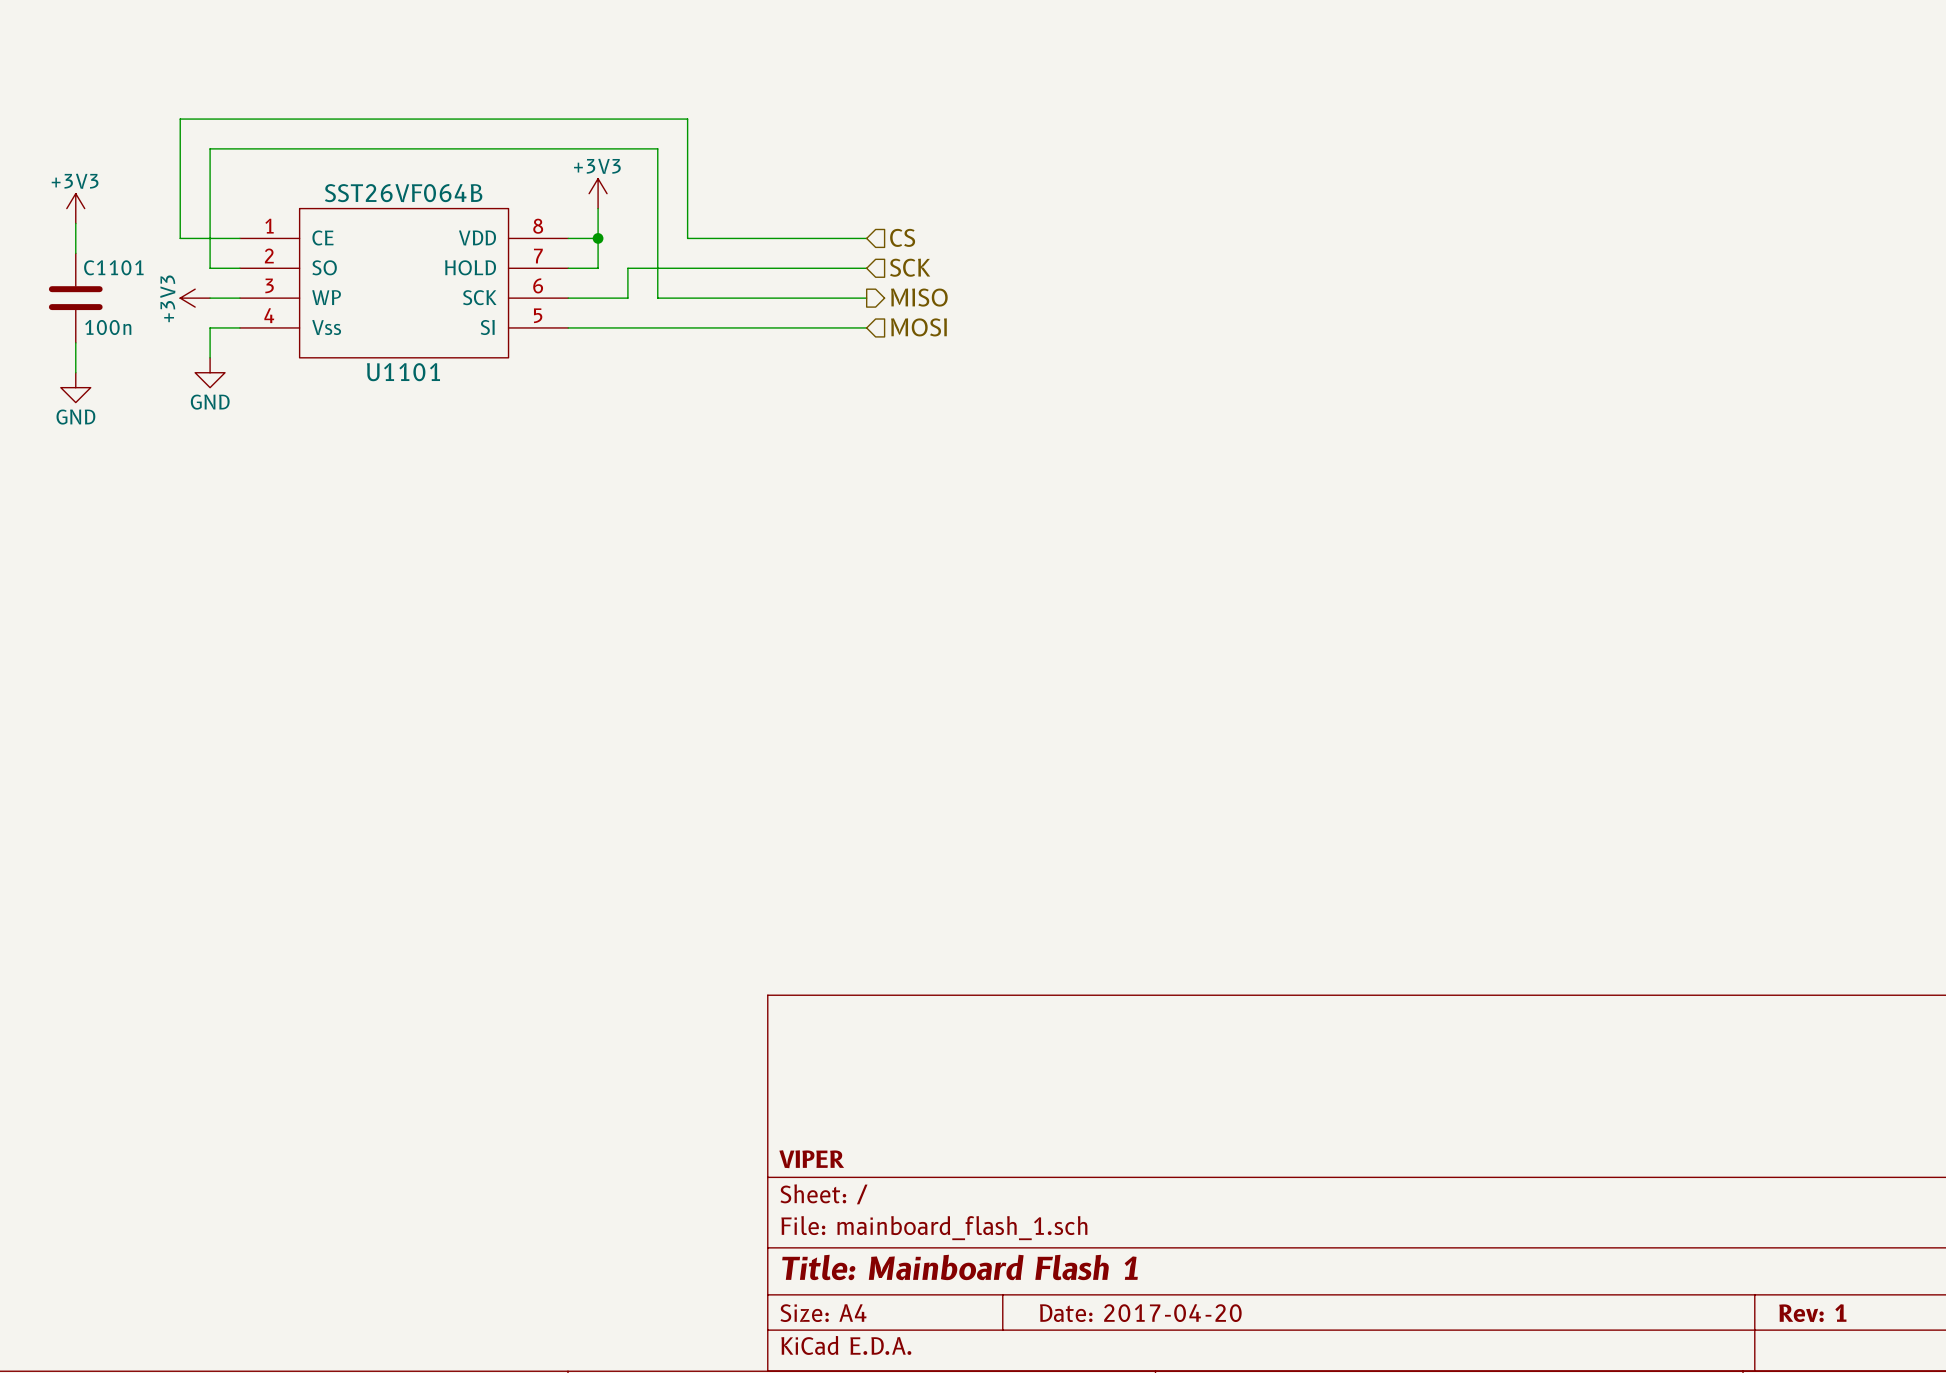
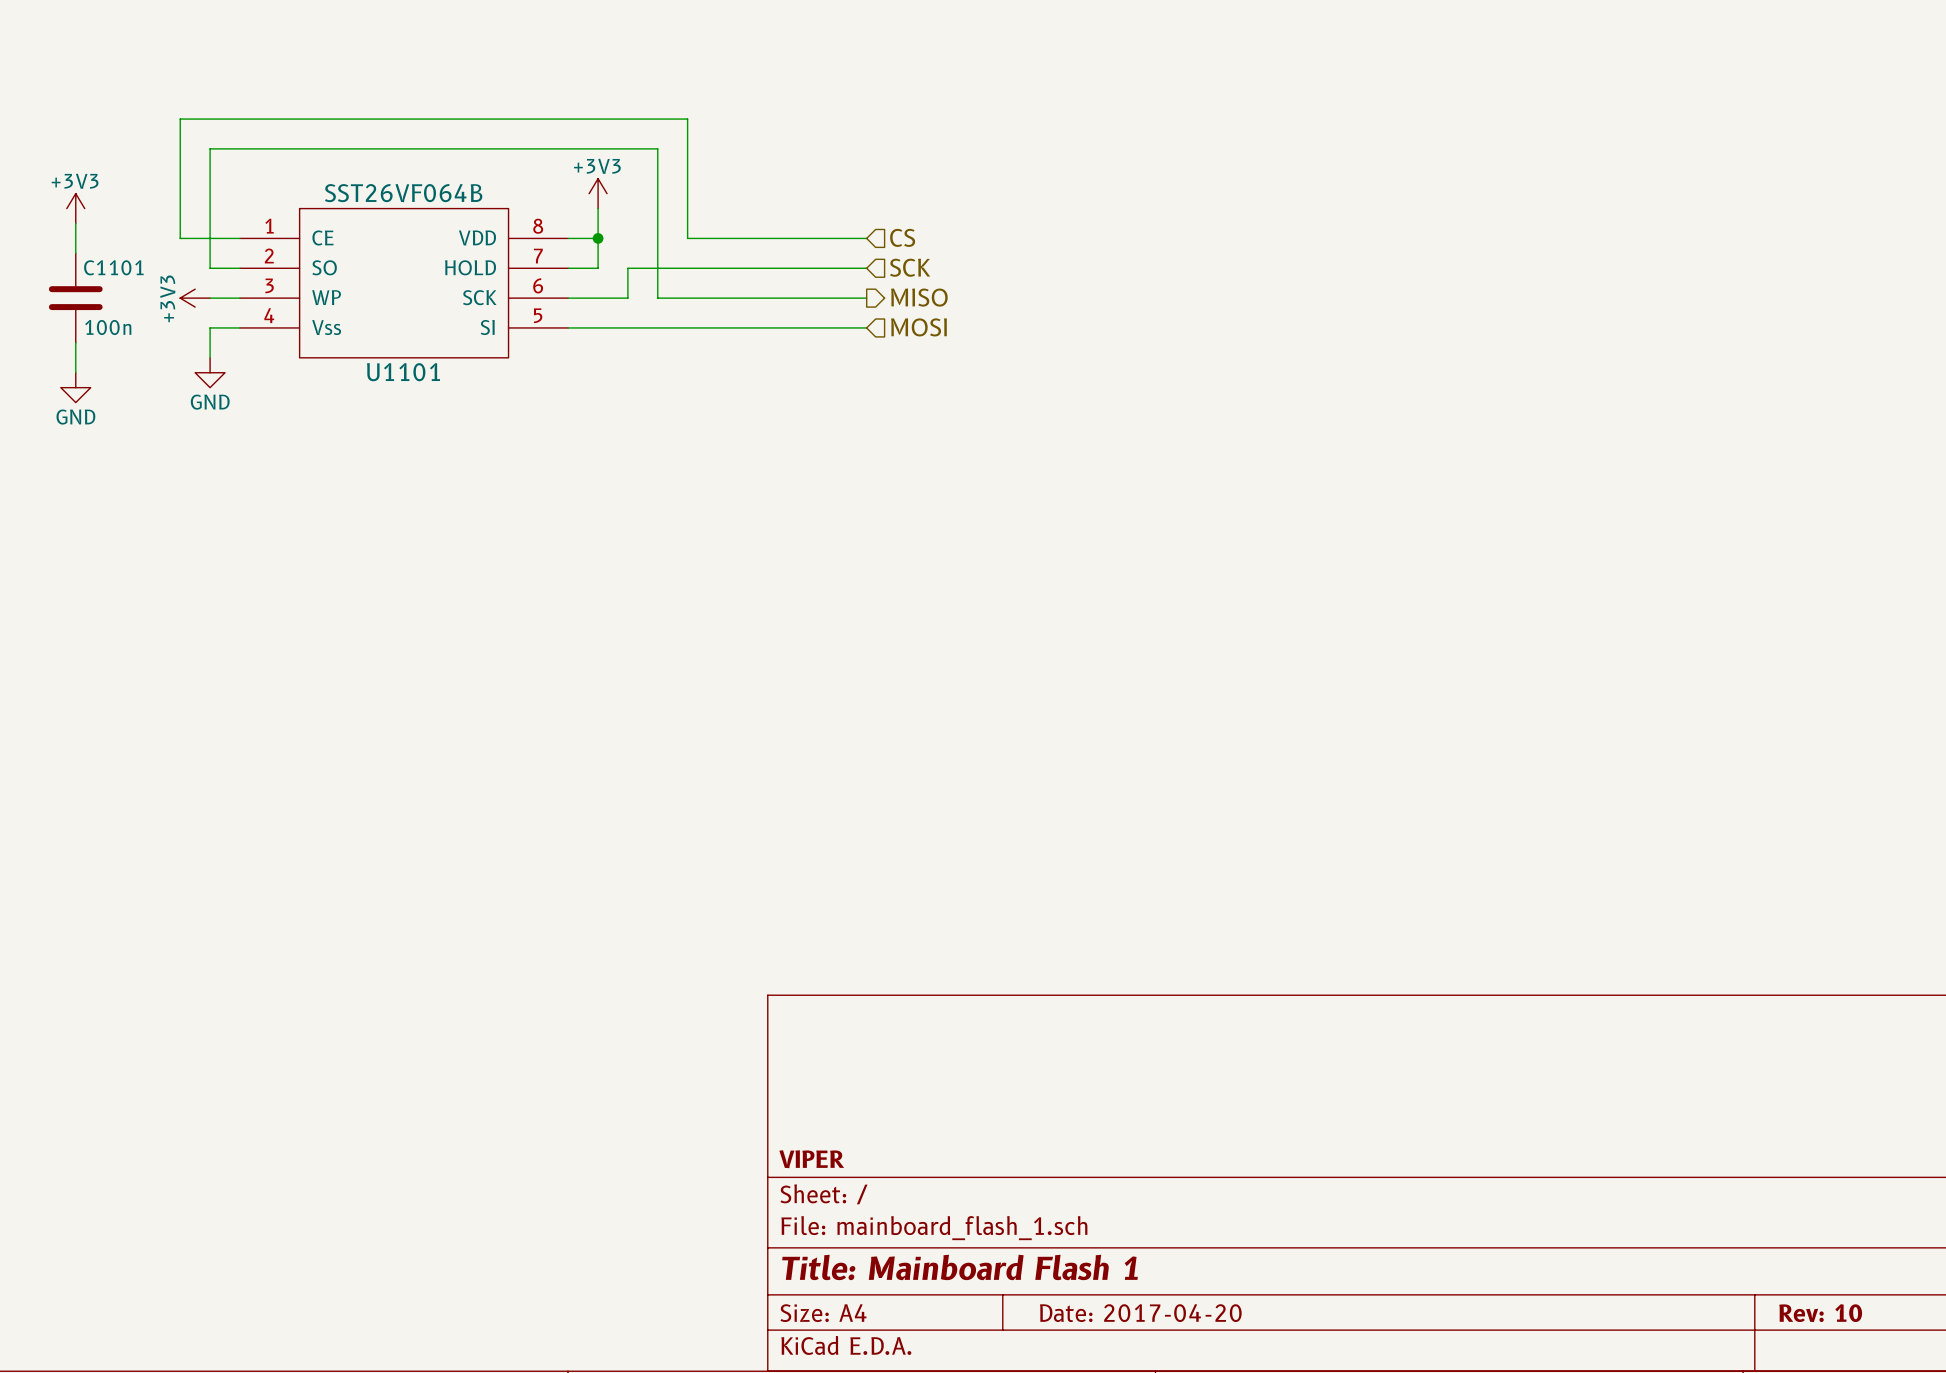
title block: Rev: 1 (1812, 1313) -> Rev: 10 (1820, 1313)

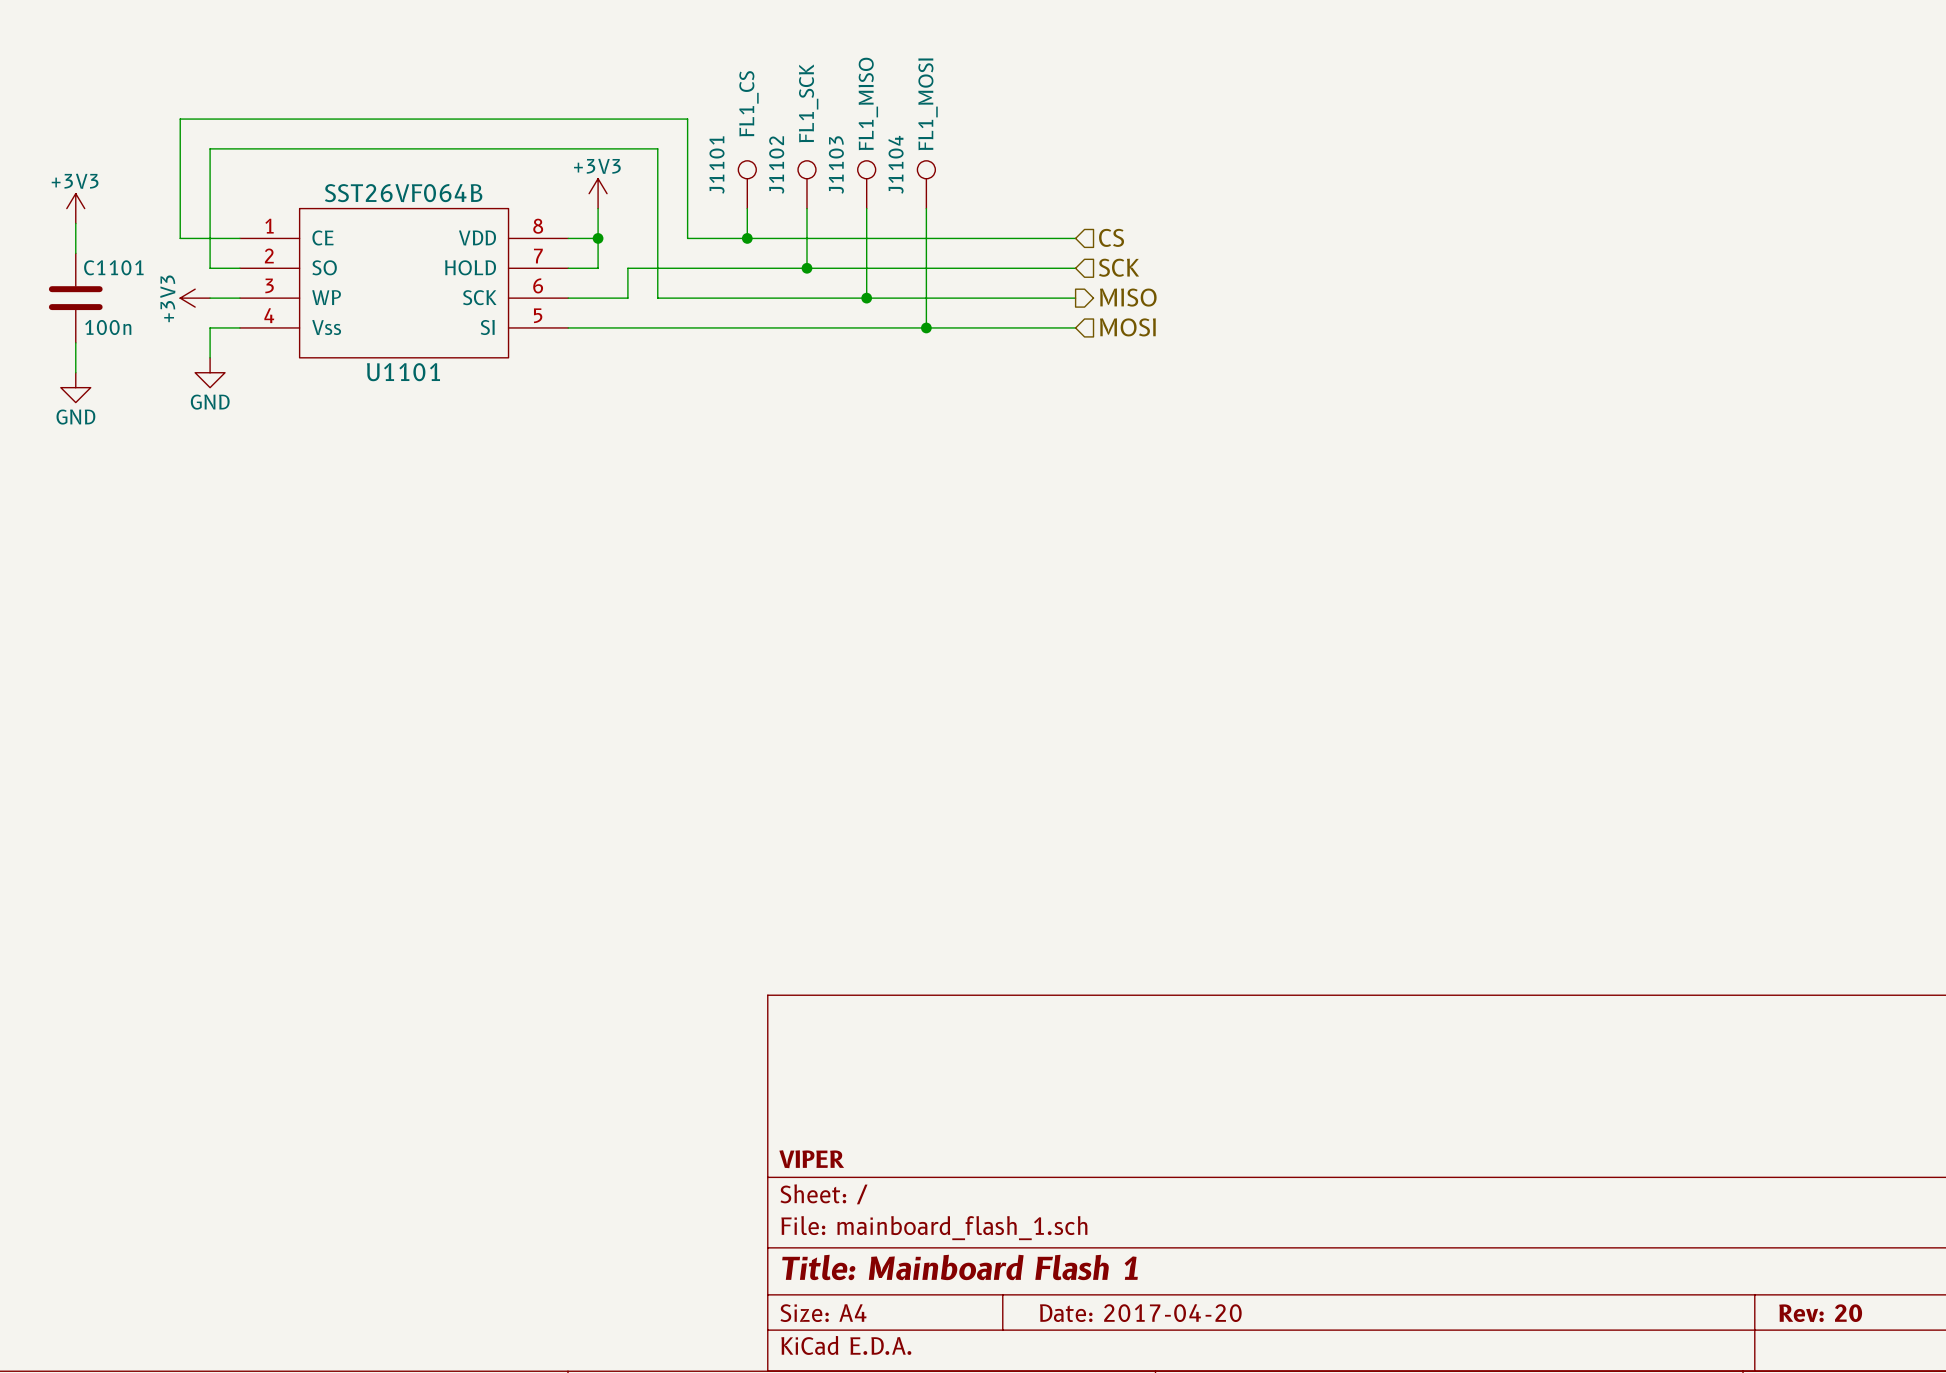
J1101: none -> FL1_CS (747, 184)
J1102: none -> FL1_SCK (806, 184)
J1103: none -> FL1_MISO (866, 184)
J1104: none -> FL1_MOSI (926, 184)
wire: none -> (747, 208) (747, 238)
wire: none -> (806, 208) (806, 268)
wire: none -> (866, 208) (866, 298) (1075, 298)
wire: none -> (926, 208) (926, 327)
hierarchical label position: CS (902, 237) -> CS (1111, 237)
junction: none -> (747, 238)
wire: none -> (866, 238) (1075, 238)
hierarchical label position: SCK (910, 267) -> SCK (1119, 267)
junction: none -> (806, 268)
wire: none -> (866, 268) (1075, 268)
hierarchical label position: MISO (919, 297) -> MISO (1128, 297)
junction: none -> (866, 298)
wire: none -> (866, 327) (1075, 327)
hierarchical label position: MOSI (918, 327) -> MOSI (1127, 327)
junction: none -> (926, 327)
title block: Rev: 10 (1820, 1313) -> Rev: 20 (1820, 1313)

